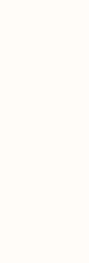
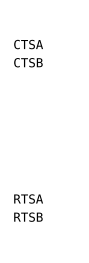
label: none -> CTSA (28, 44)
label: none -> CTSB (28, 62)
label: none -> RTSA (28, 199)
label: none -> RTSB (28, 217)

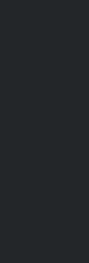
label: CTSA (28, 44) -> none
label: CTSB (28, 62) -> none
label: RTSA (28, 199) -> none
label: RTSB (28, 217) -> none

